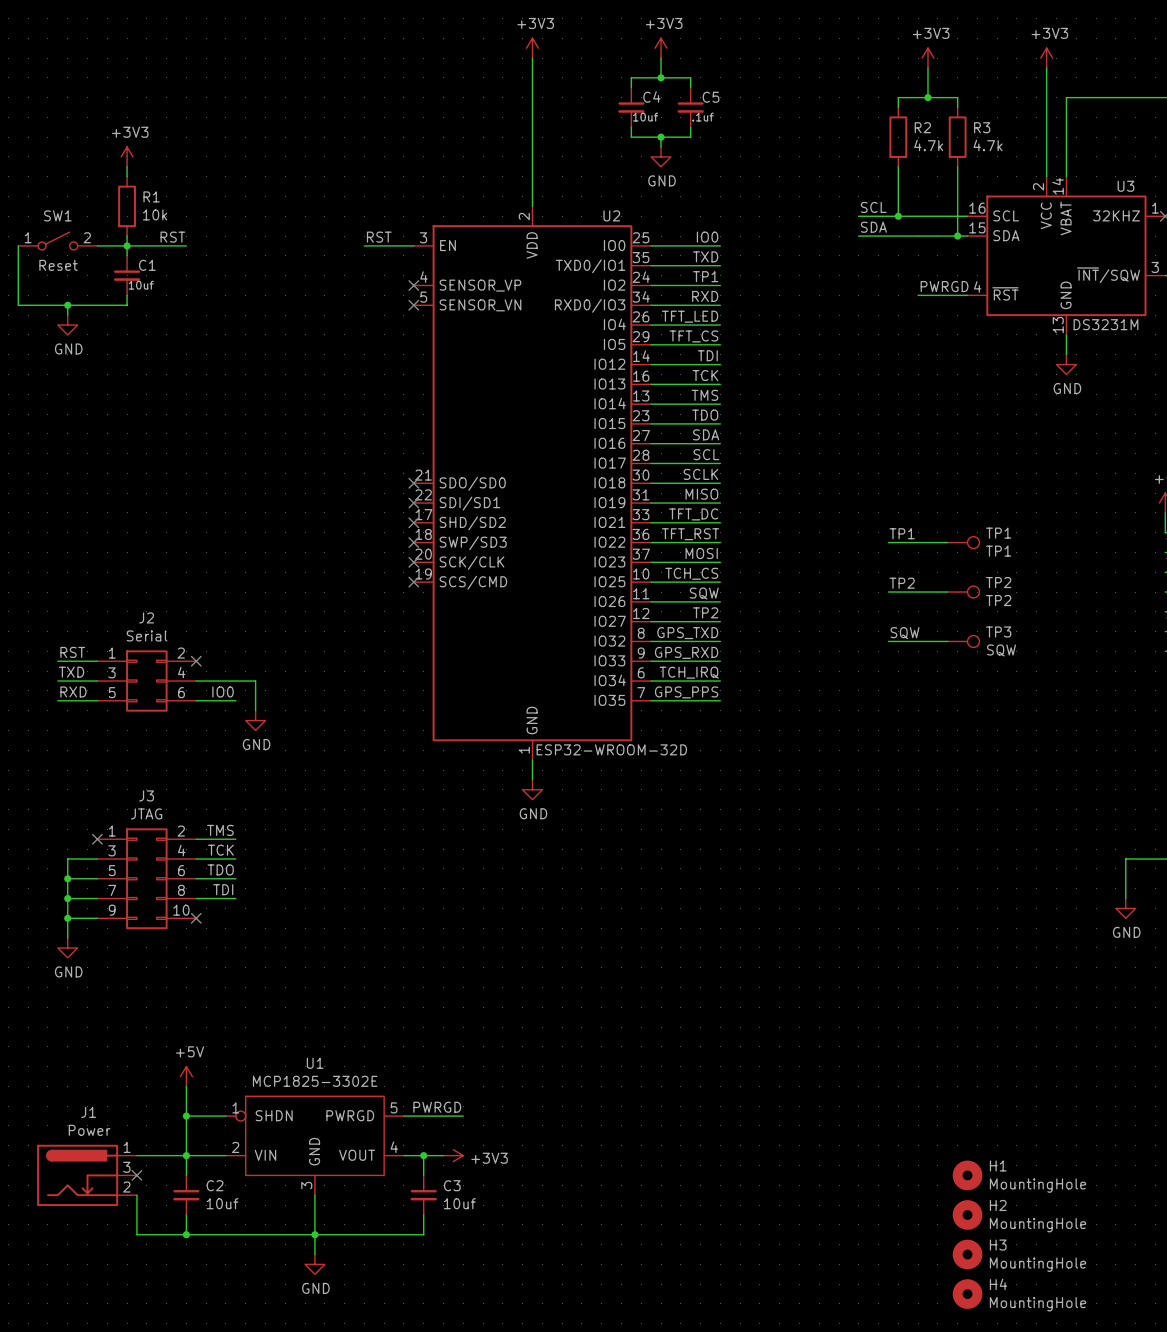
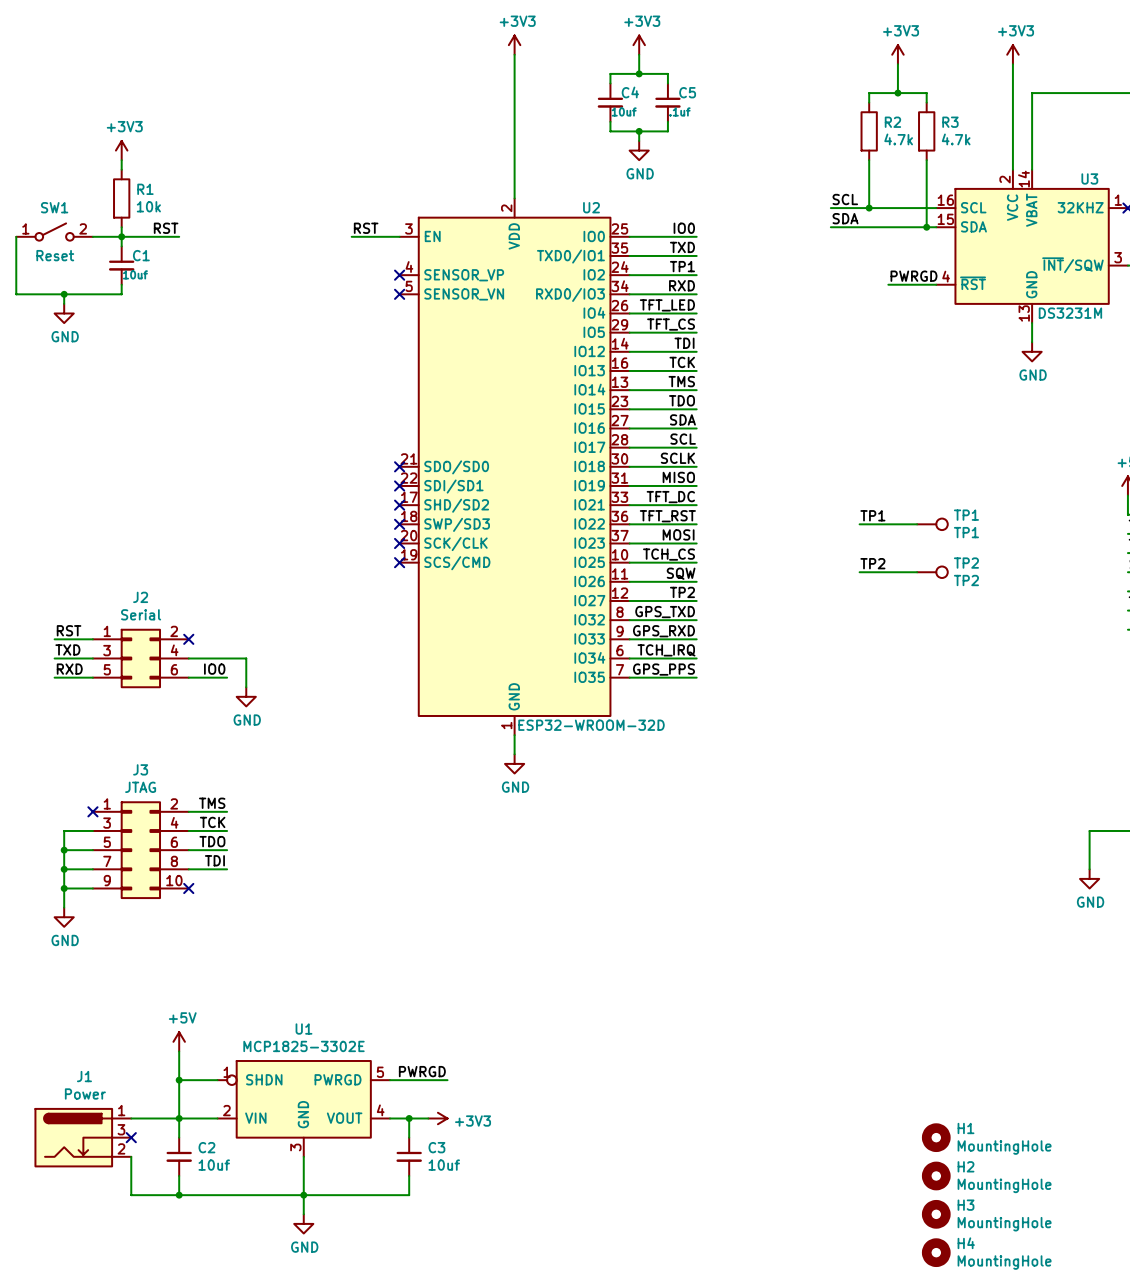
label: SQW (904, 633) -> none
wire: (888, 641) (947, 641) -> none
TP3: SQW (963, 641) -> none

